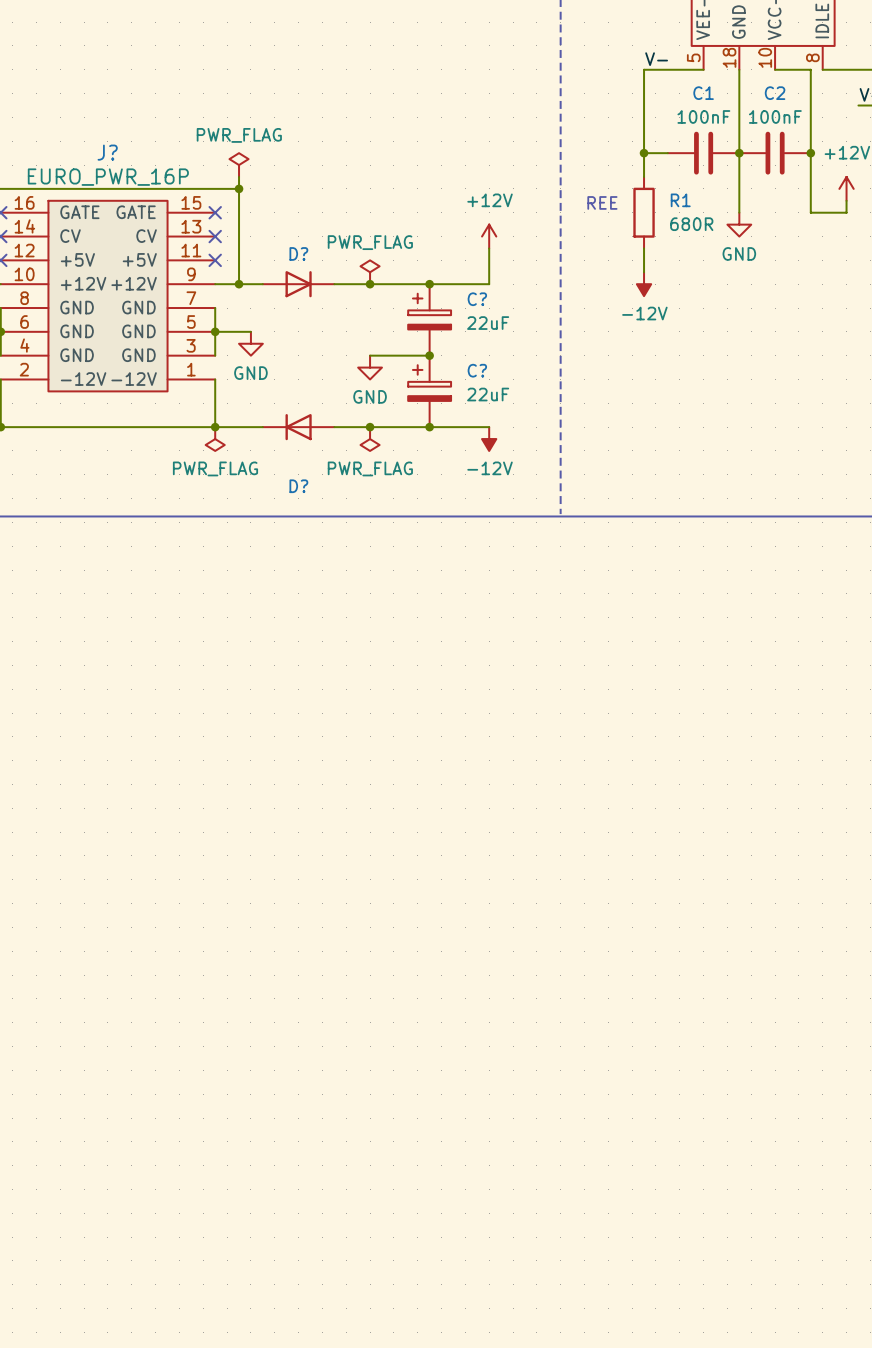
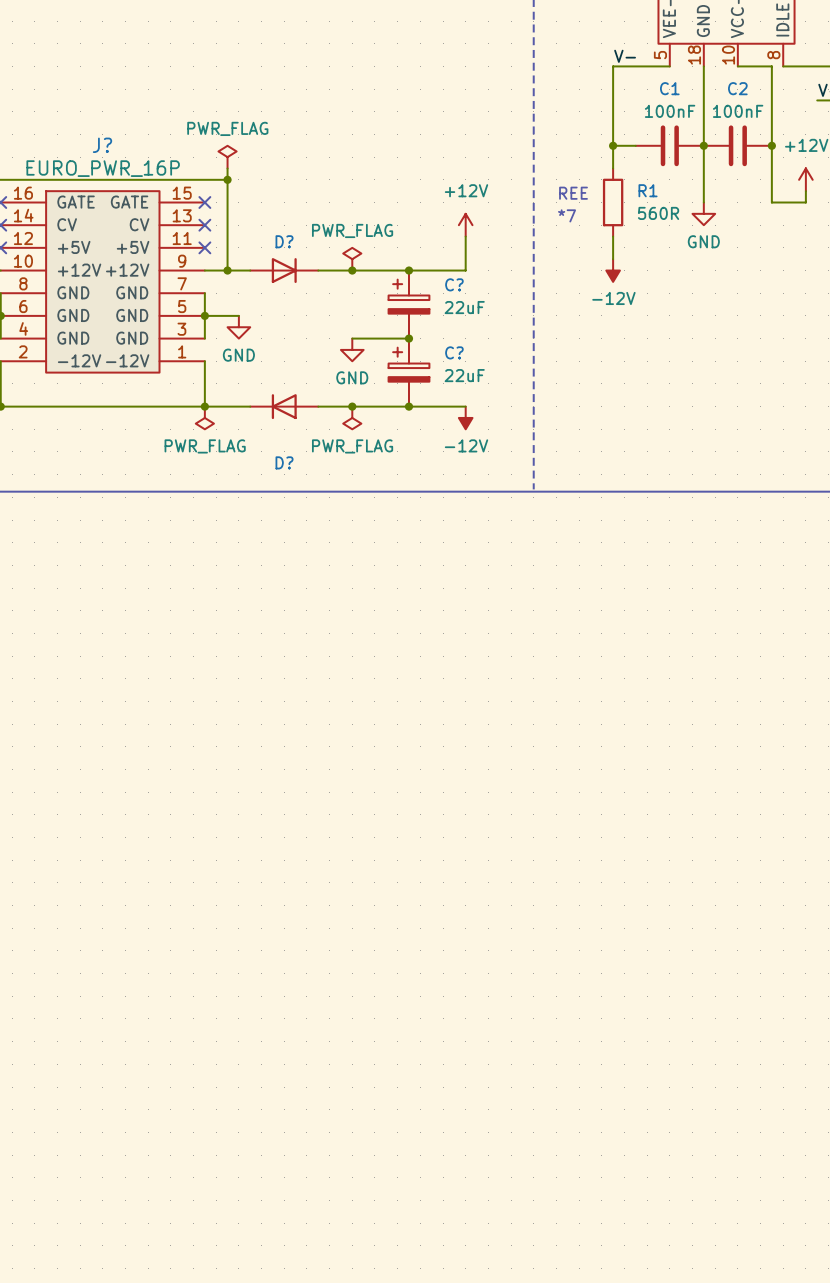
R1 value: 680R (691, 224) -> 560R (658, 213)
text: none -> *7 (567, 215)

